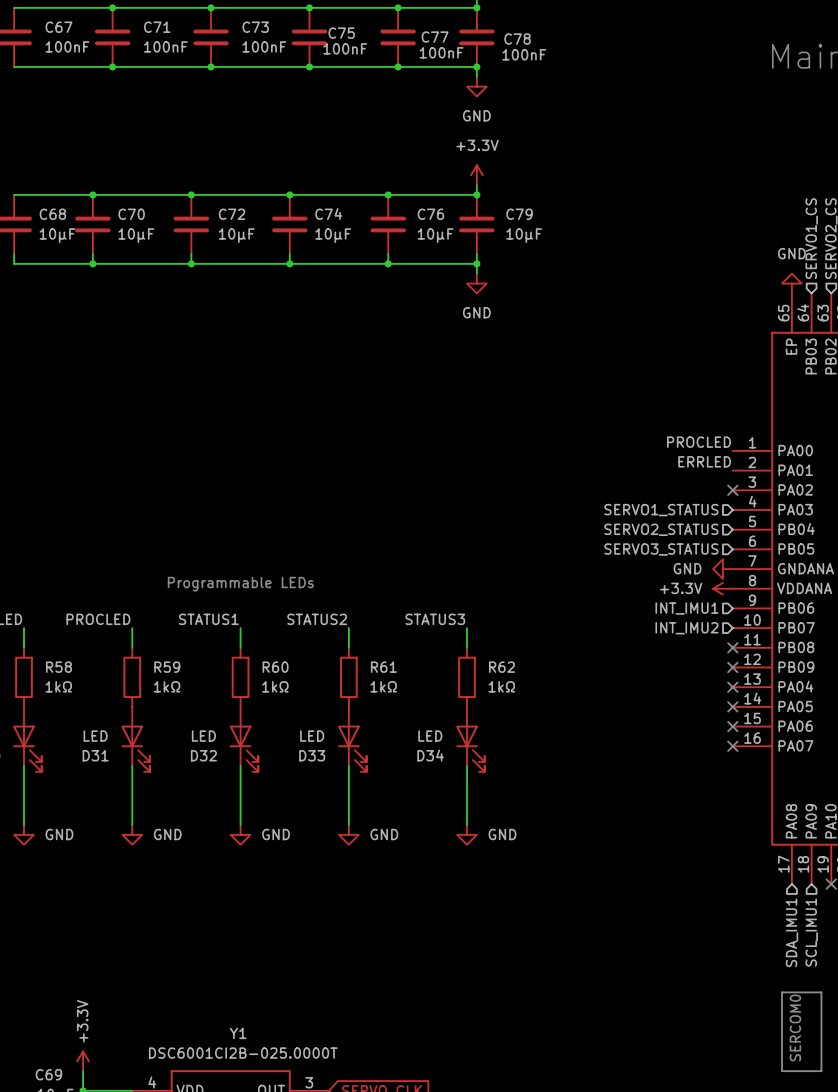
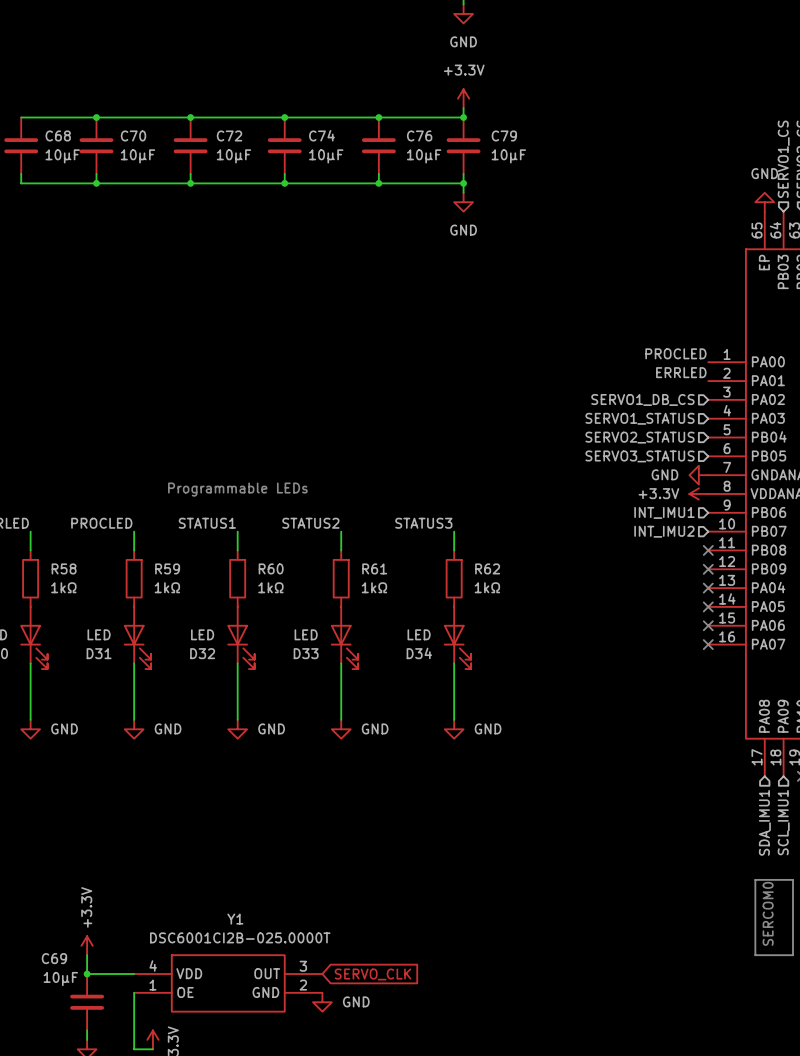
hierarchical label: none -> SERVO1_DB_CS (642, 399)
no-connect mark: (732, 490) -> none

